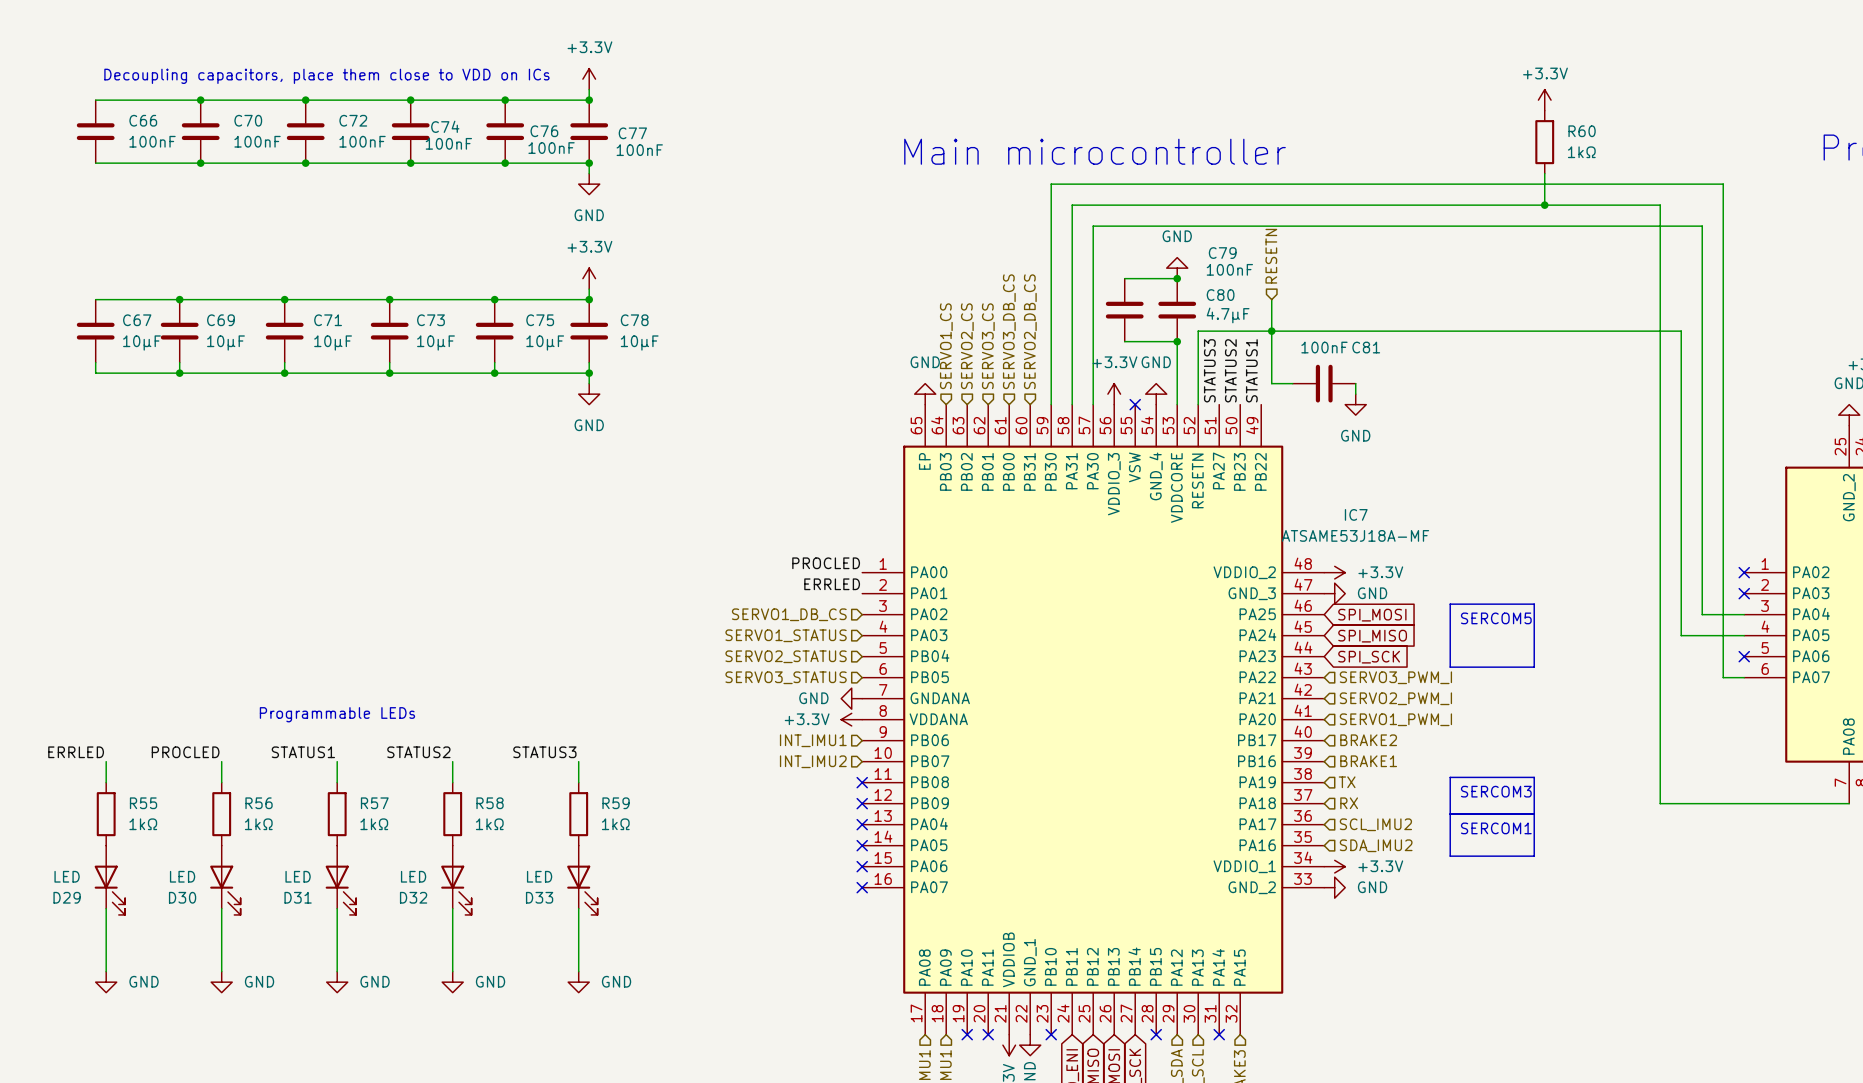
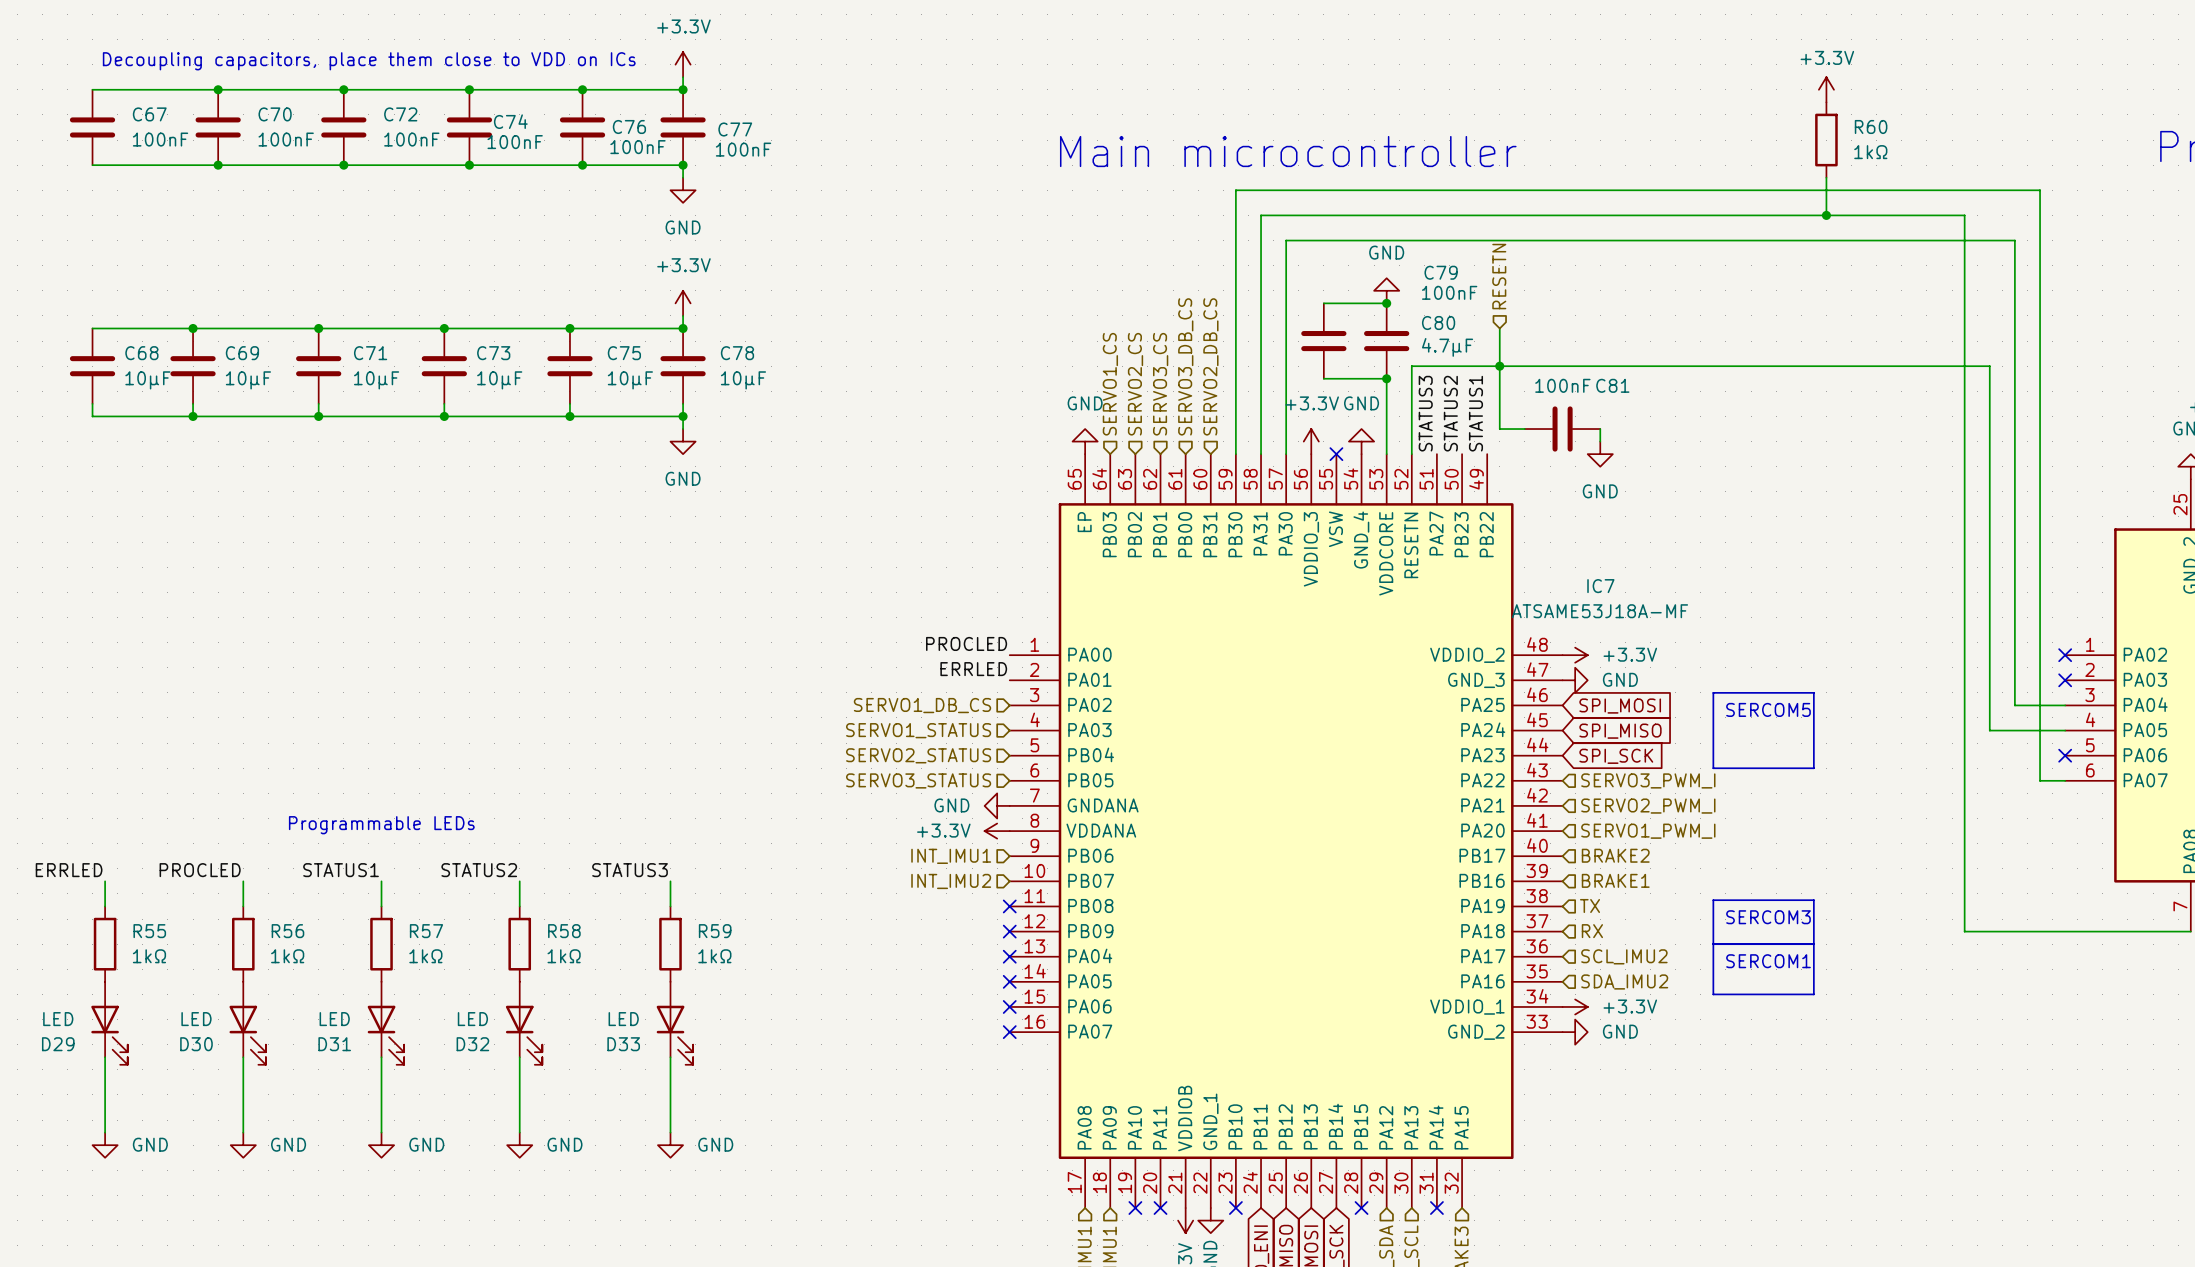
C66 name: C66 (143, 120) -> C67 (149, 114)
C67 name: C67 (137, 320) -> C68 (141, 353)

